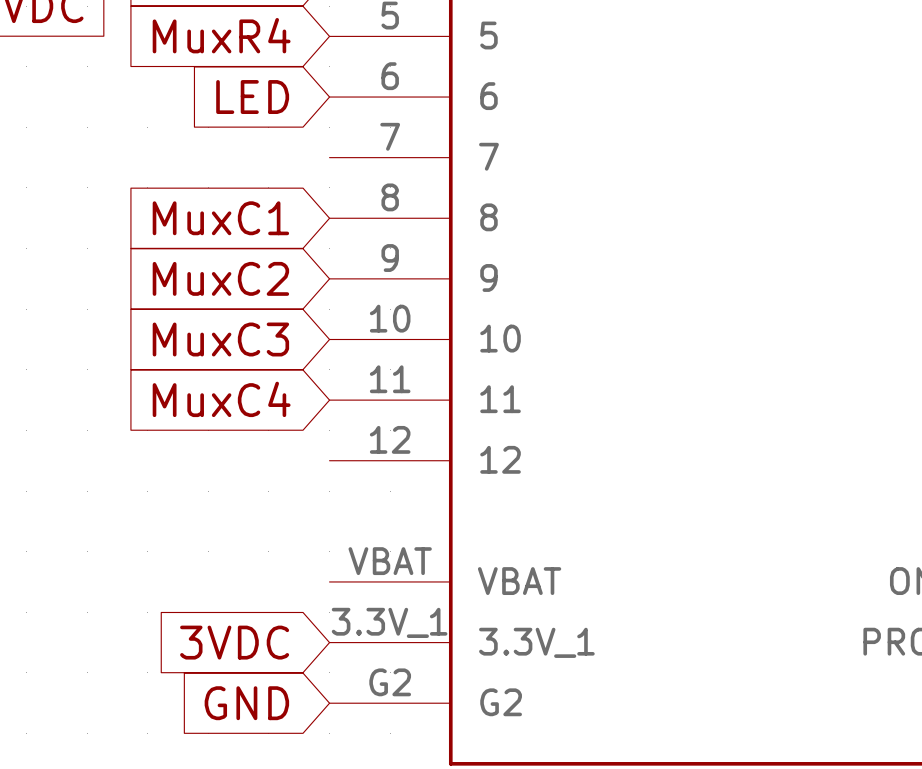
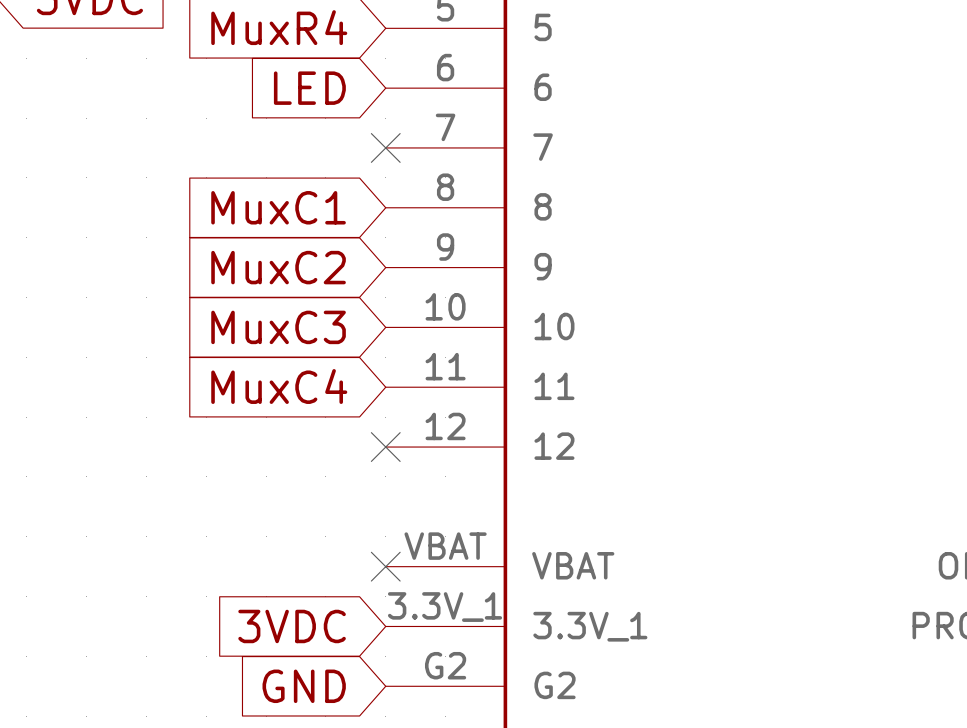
no-connect mark: none -> (385, 147)
no-connect mark: none -> (385, 447)
no-connect mark: none -> (385, 566)

